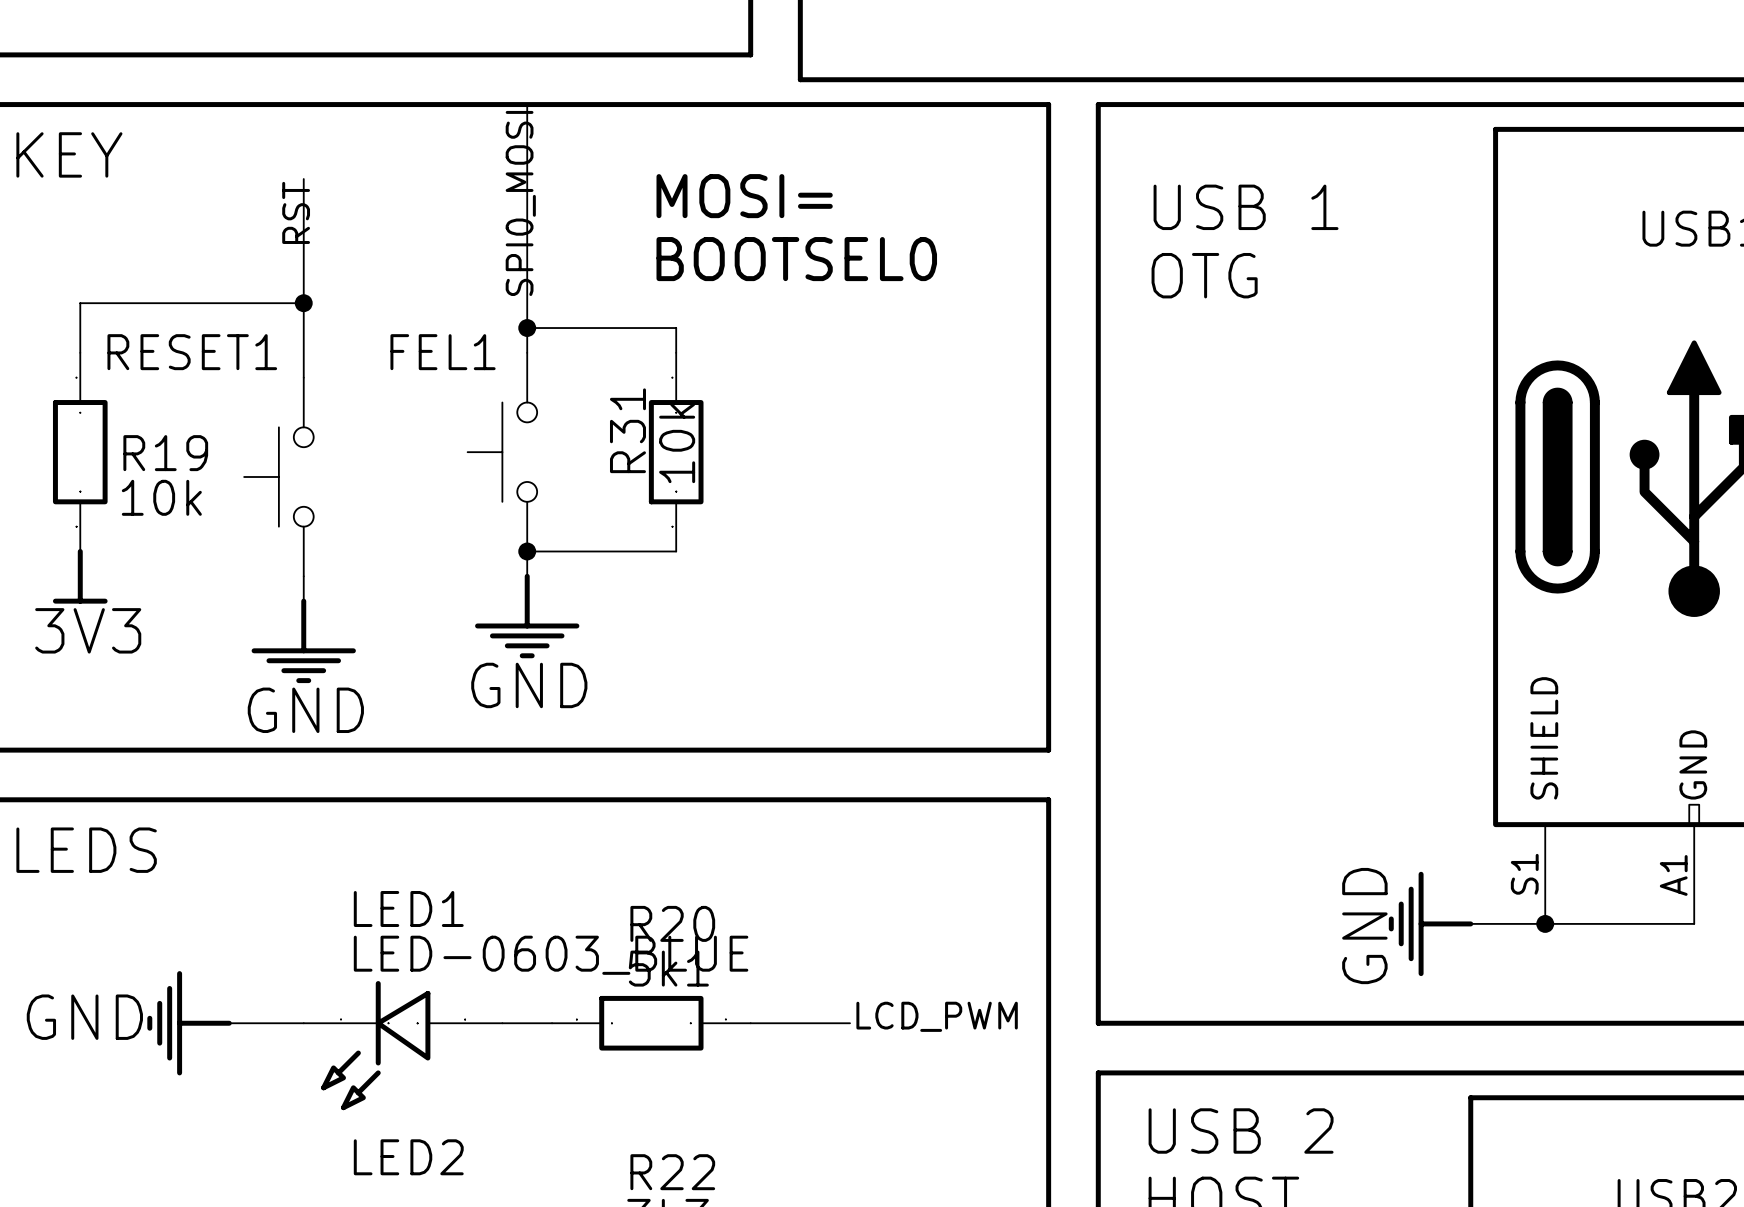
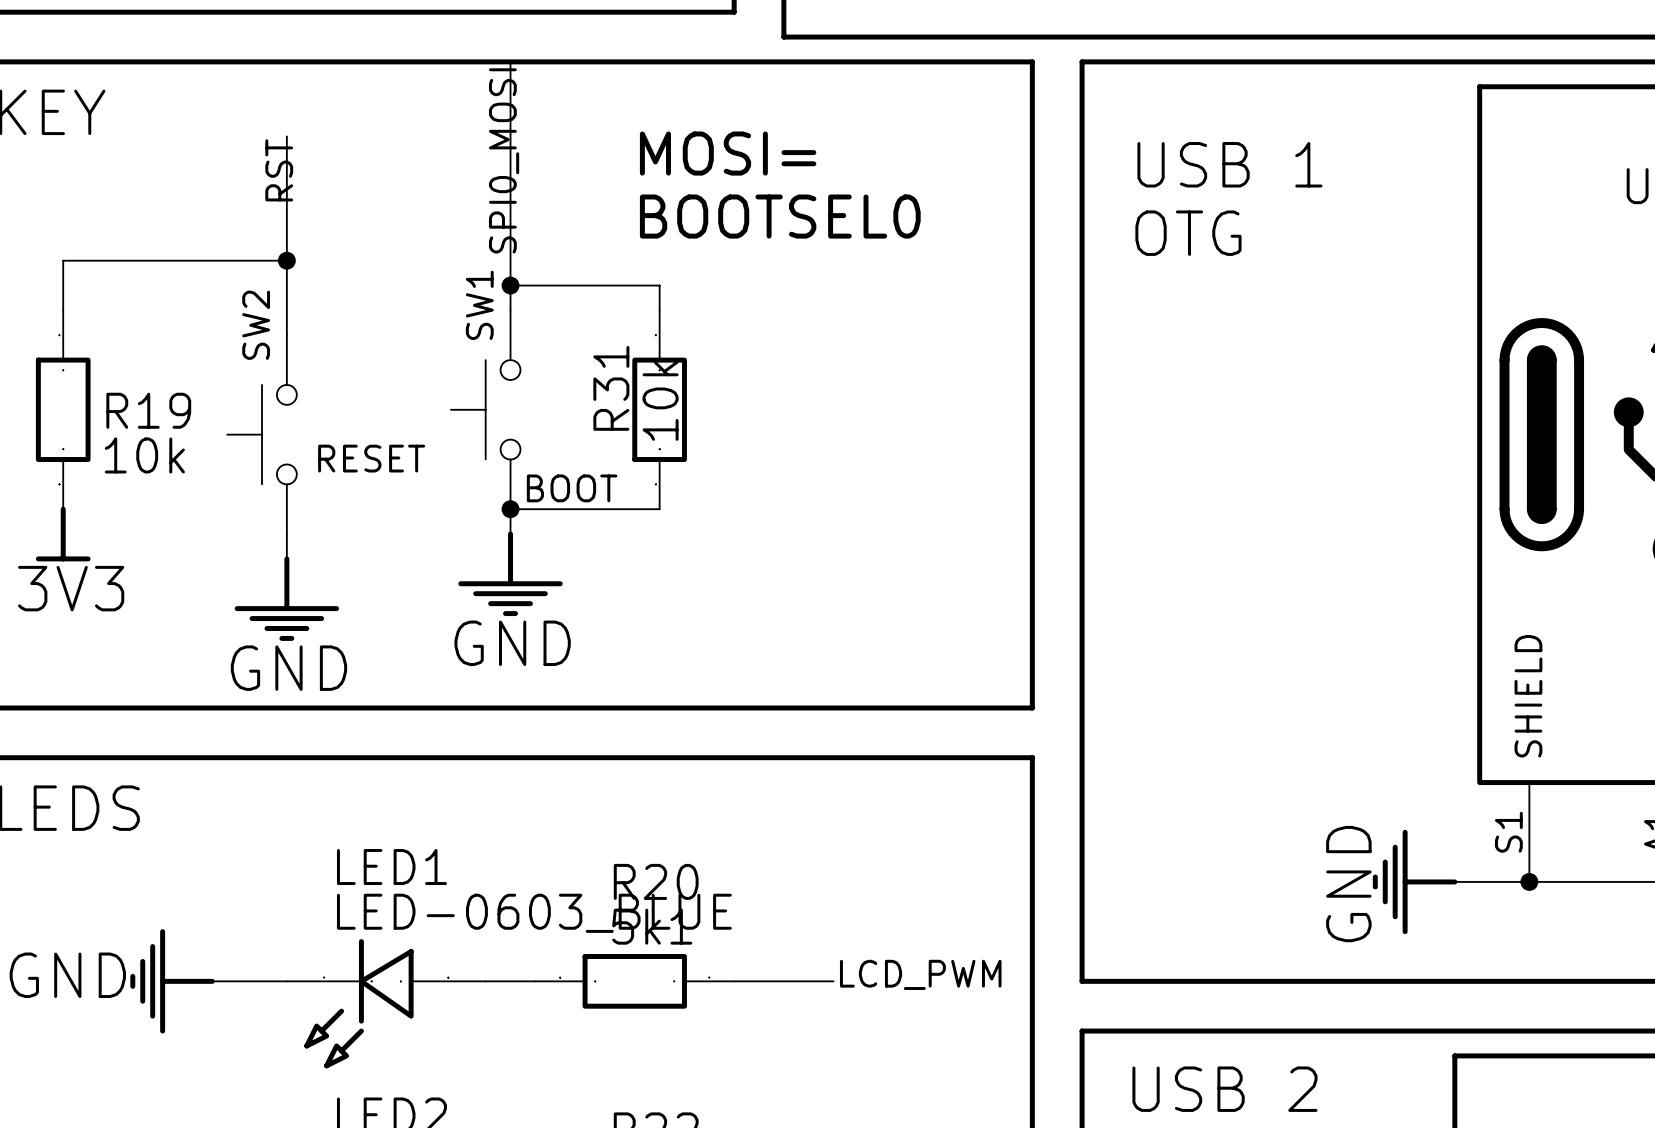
RESET1 name: RESET1 (192, 352) -> SW2 (256, 325)
FEL1 name: FEL1 (443, 352) -> SW1 (479, 305)
RESET1 value: none -> RESET (371, 458)
FEL1 value: none -> BOOT (572, 488)

